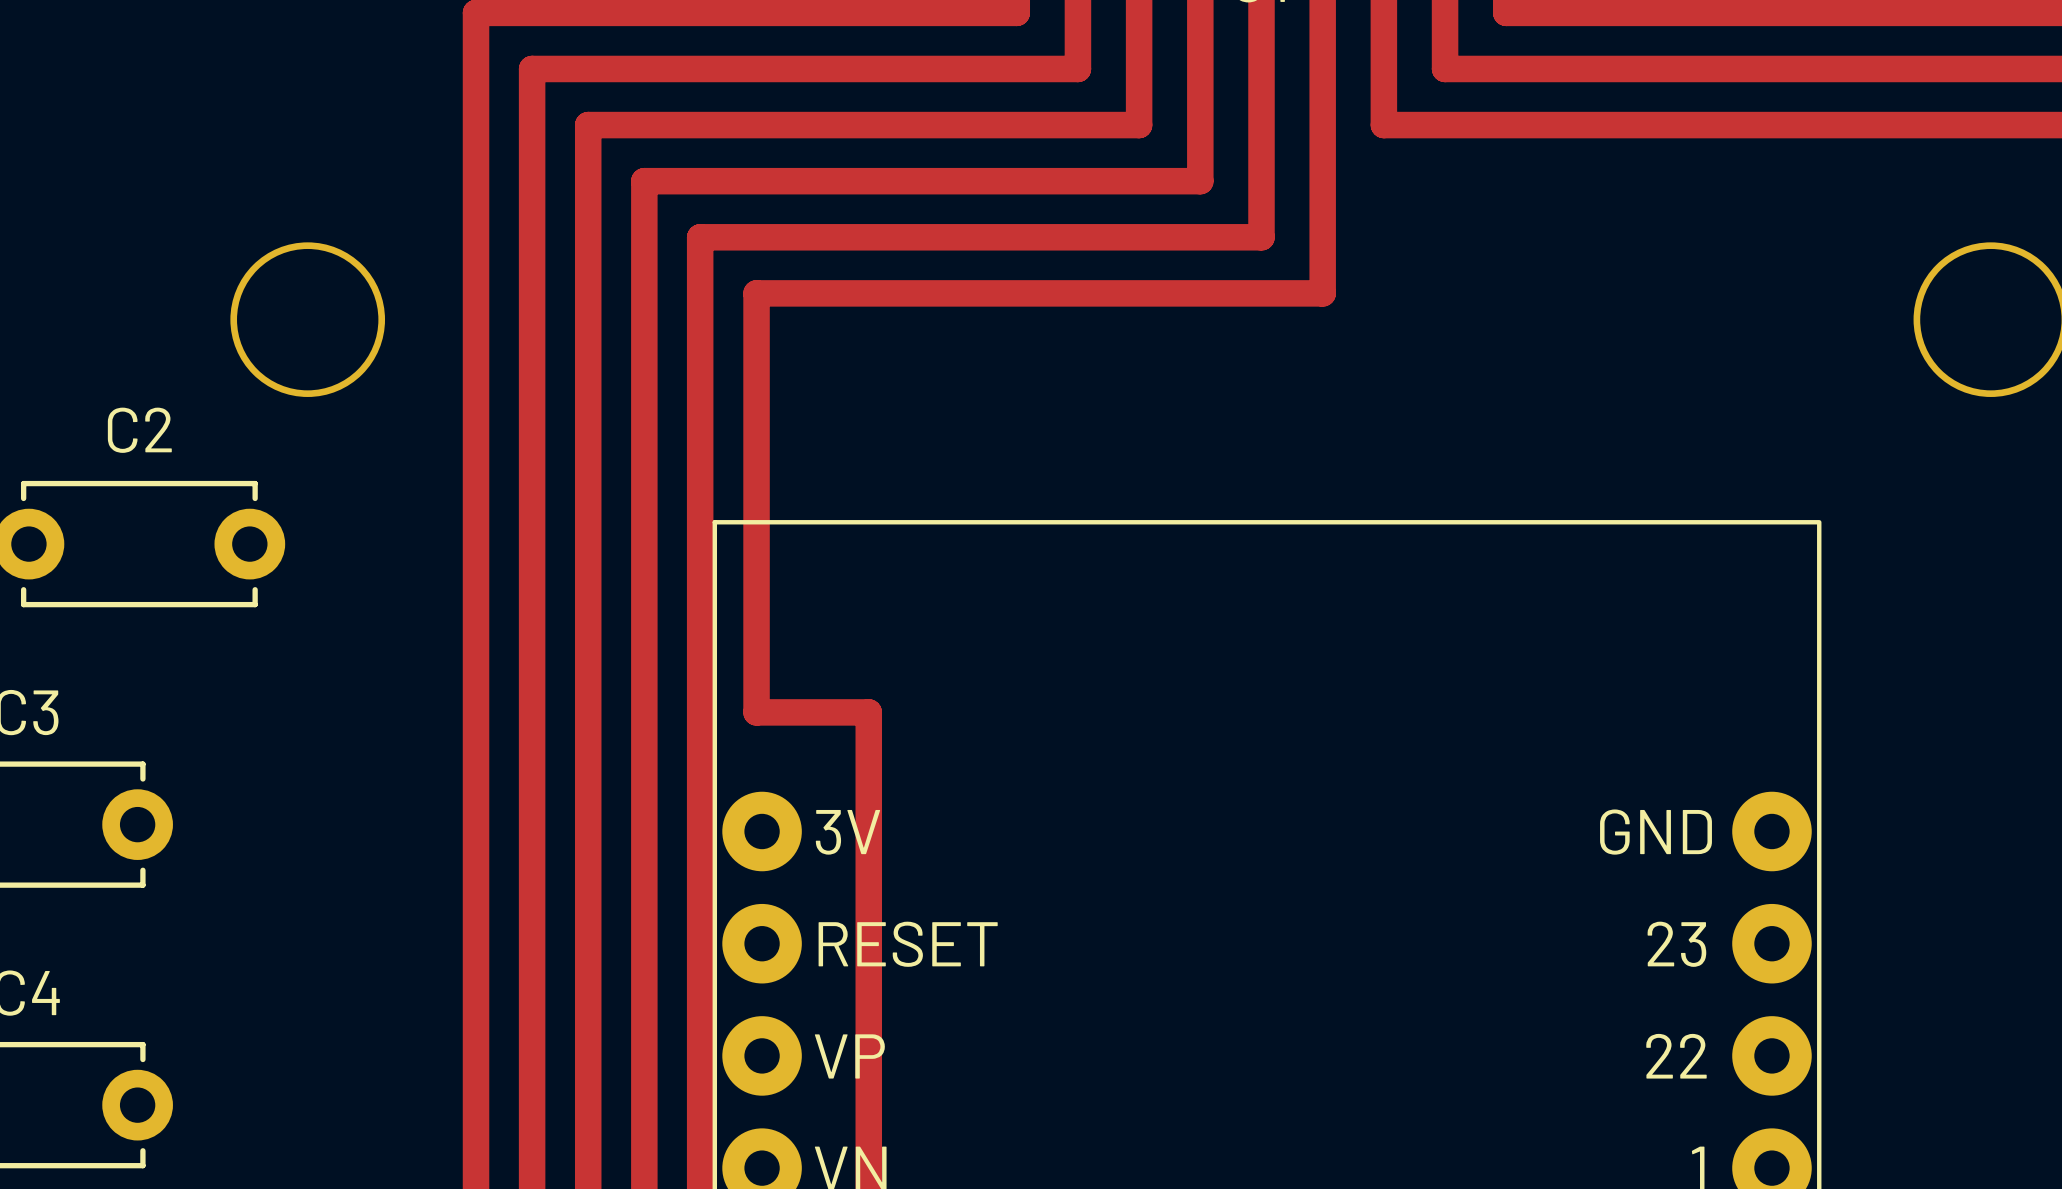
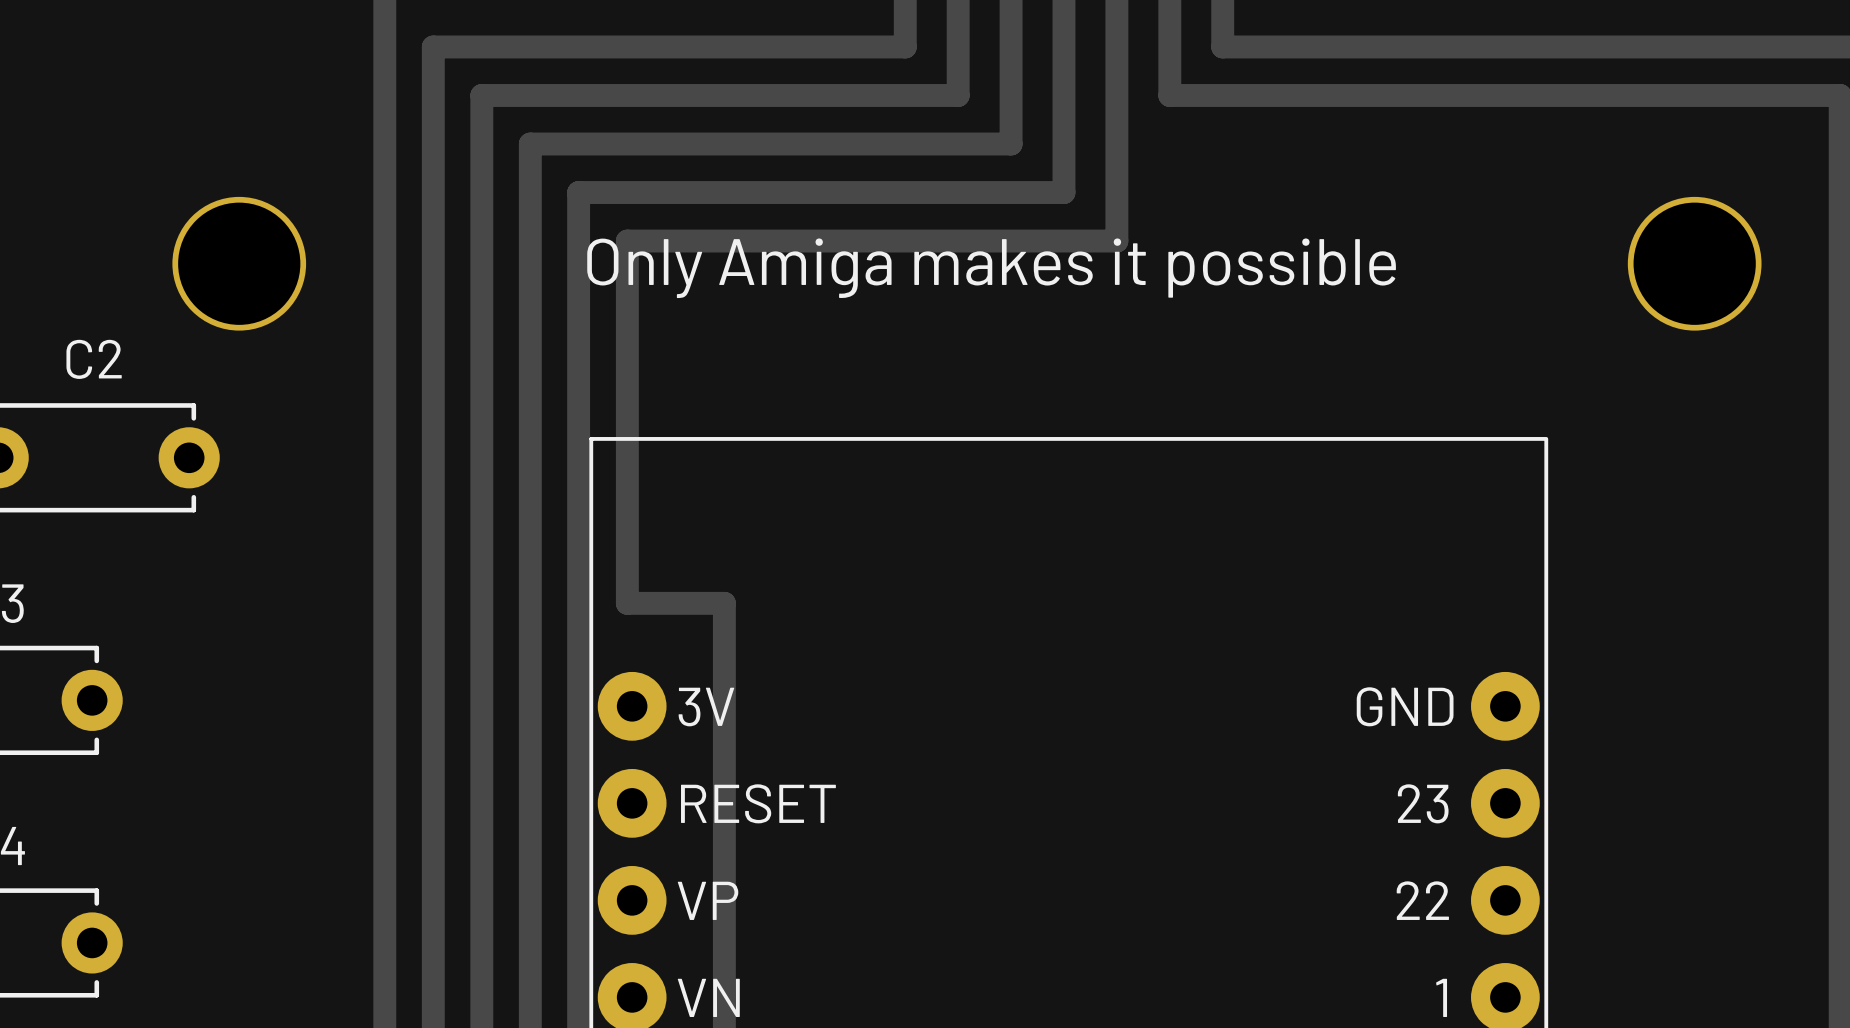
text: none -> Only Amiga makes it possible (991, 268)

